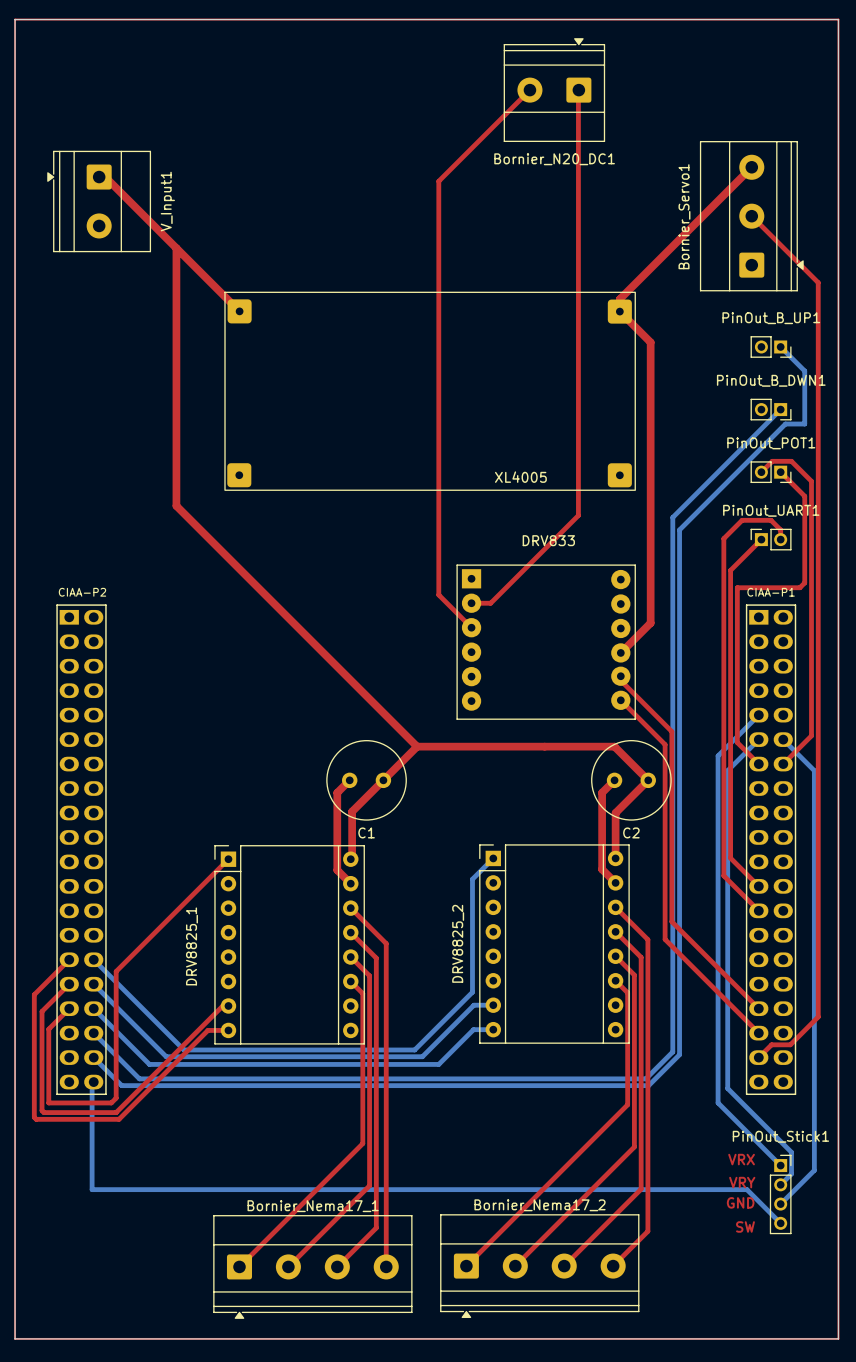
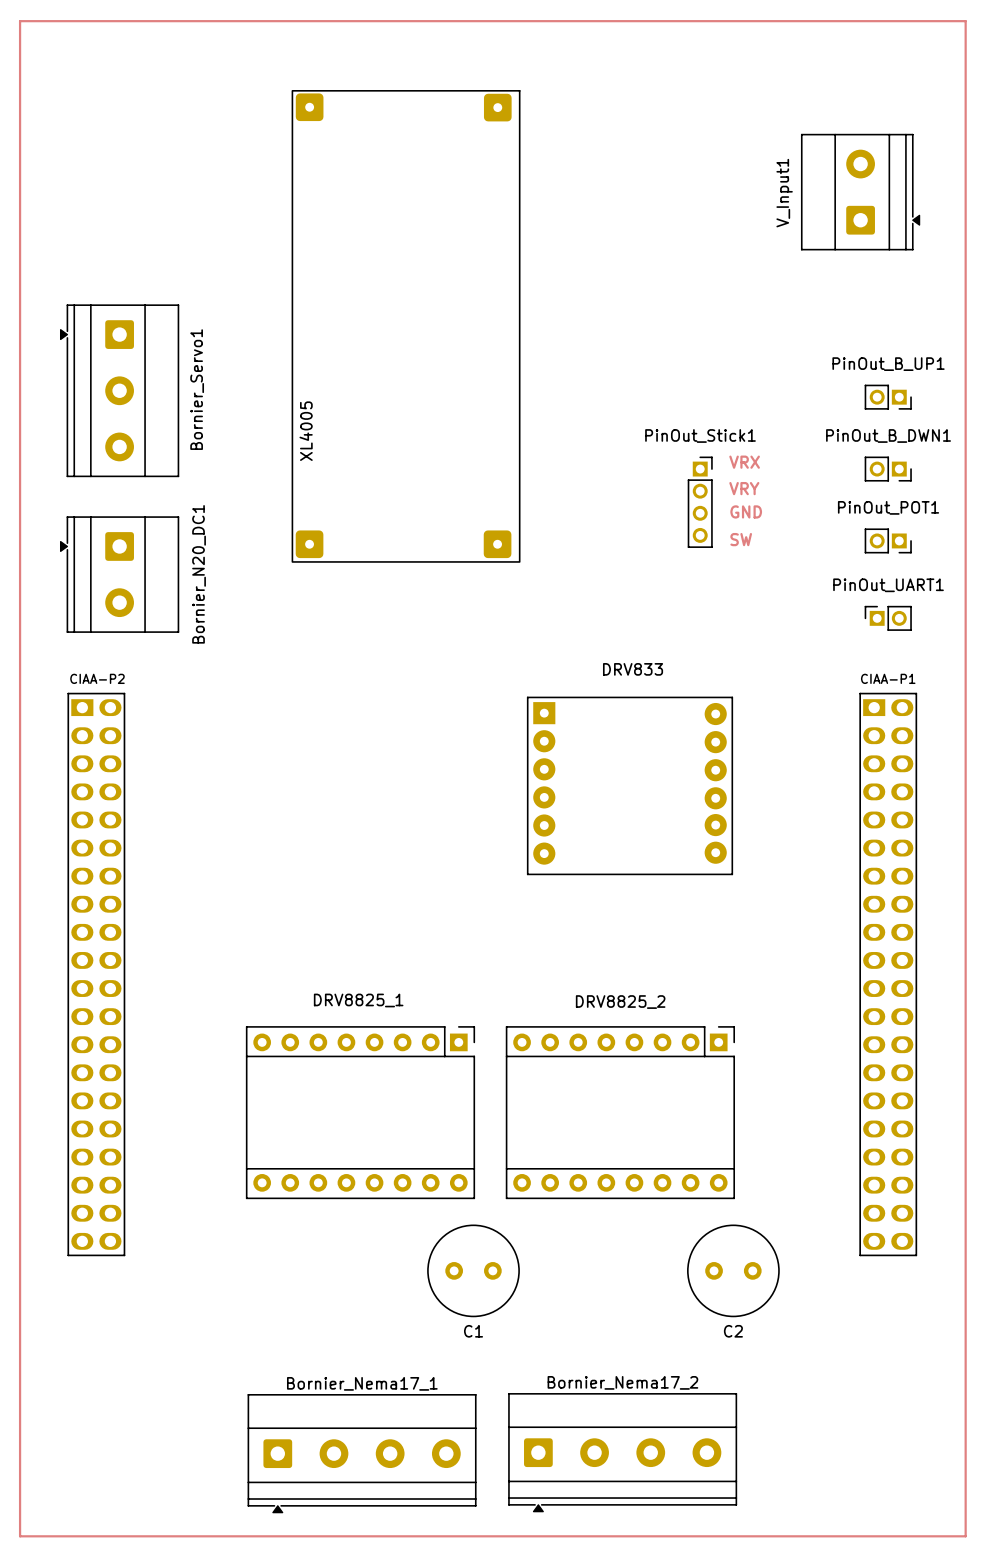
board edge: (15, 19) (838, 19) (838, 1338) (15, 1338) (15, 19) -> none
top track: (529, 90) (438, 181) (438, 594) (471, 627) -> none
Bornier_N20_DC1 rotation: 0° (554, 90) -> 90° counterclockwise (119, 574)
Bornier_N20_DC1 position: (554, 90) -> (119, 574)
top track: (578, 90) (578, 515) (490, 603) (468, 603) -> none
top track: (751, 167) (619, 299) (619, 311) (650, 342) (650, 623) (620, 652) -> none
top track: (99, 177) (105, 177) (239, 311) -> none
V_Input1 rotation: 0° (99, 201) -> 180° (860, 192)
V_Input1 position: (99, 201) -> (860, 192)
top track: (751, 216) (818, 282) (818, 1016) (790, 1044) (771, 1044) (758, 1057) -> none
Bornier_Servo1 rotation: 0° (751, 216) -> 180° (119, 390)
Bornier_Servo1 position: (751, 216) -> (119, 390)
top track: (176, 248) (176, 505) (417, 746) -> none
bottom track: (780, 346) (804, 371) (804, 424) (785, 424) (679, 529) (679, 1054) (648, 1085) (121, 1085) (93, 1057) -> none
XL4005 rotation: 0° (430, 391) -> 90° clockwise (406, 326)
text: none -> VRX (744, 462)
bottom track: (780, 409) (672, 517) (672, 1051) (645, 1078) (139, 1078) (93, 1033) -> none
text: none -> VRY (744, 488)
text: none -> GND (746, 511)
text: none -> SW (741, 539)
top track: (761, 472) (772, 461) (791, 461) (811, 481) (811, 735) (783, 764) -> none
top track: (780, 472) (804, 496) (804, 582) (799, 587) (737, 587) (737, 742) (758, 764) -> none
top track: (761, 539) (730, 570) (730, 858) (758, 886) -> none
top track: (780, 539) (780, 529) (771, 520) (742, 520) (723, 538) (723, 875) (758, 910) -> none
DRV833 position: (546, 642) -> (630, 785)
top track: (620, 676) (620, 680) (671, 731) (671, 921) (758, 1008) -> none
top track: (620, 700) (665, 744) (665, 939) (758, 1033) -> none
bottom track: (758, 715) (718, 755) (718, 1102) (780, 1165) -> none
bottom track: (758, 739) (727, 770) (727, 1088) (791, 1152) (791, 1173) (780, 1184) -> none
bottom track: (783, 739) (814, 770) (814, 1170) (780, 1204) -> none
top track: (417, 746) (614, 746) (648, 780) (615, 812) (615, 858) -> none
top track: (417, 746) (352, 811) (350, 859) -> none
top track: (349, 780) (337, 792) (337, 870) (350, 883) -> none
C1 position: (366, 780) -> (473, 1270)
top track: (614, 780) (602, 792) (602, 869) (615, 882) -> none
C2 position: (631, 780) -> (733, 1270)
bottom track: (493, 858) (472, 879) (472, 992) (414, 1049) (183, 1049) (93, 959) -> none
top track: (228, 859) (116, 971) (116, 1098) (111, 1102) (48, 1102) (48, 1029) (69, 1008) -> none
top track: (615, 907) (647, 939) (647, 1231) (613, 1266) -> none
top track: (350, 908) (386, 943) (386, 1266) -> none
top track: (615, 931) (641, 957) (641, 1189) (564, 1266) -> none
top track: (350, 932) (376, 958) (376, 1227) (337, 1266) -> none
DRV8825_1 rotation: 0° (289, 944) -> 90° clockwise (360, 1112)
DRV8825_2 rotation: 0° (554, 944) -> 90° clockwise (620, 1112)
top track: (615, 956) (634, 975) (634, 1146) (515, 1266) -> none
top track: (350, 957) (369, 975) (369, 1185) (288, 1266) -> none
top track: (69, 959) (34, 994) (34, 1117) (36, 1119) (119, 1119) (207, 1030) (228, 1030) -> none
top track: (615, 980) (627, 992) (627, 1104) (466, 1266) -> none
top track: (350, 981) (362, 993) (362, 1143) (239, 1266) -> none
top track: (69, 984) (42, 1011) (42, 1110) (43, 1112) (116, 1112) (222, 1005) (228, 1005) -> none
bottom track: (93, 984) (166, 1056) (422, 1056) (473, 1005) (493, 1005) -> none
bottom track: (93, 1008) (149, 1064) (438, 1064) (473, 1029) (493, 1029) -> none
bottom track: (93, 1082) (92, 1083) (92, 1189) (746, 1189) (780, 1223) -> none
text: VRX (741, 1159) -> none
text: VRY (742, 1182) -> none
PinOut_Stick1 position: (780, 1194) -> (700, 502)
text: GND (740, 1202) -> none
text: SW (745, 1226) -> none

